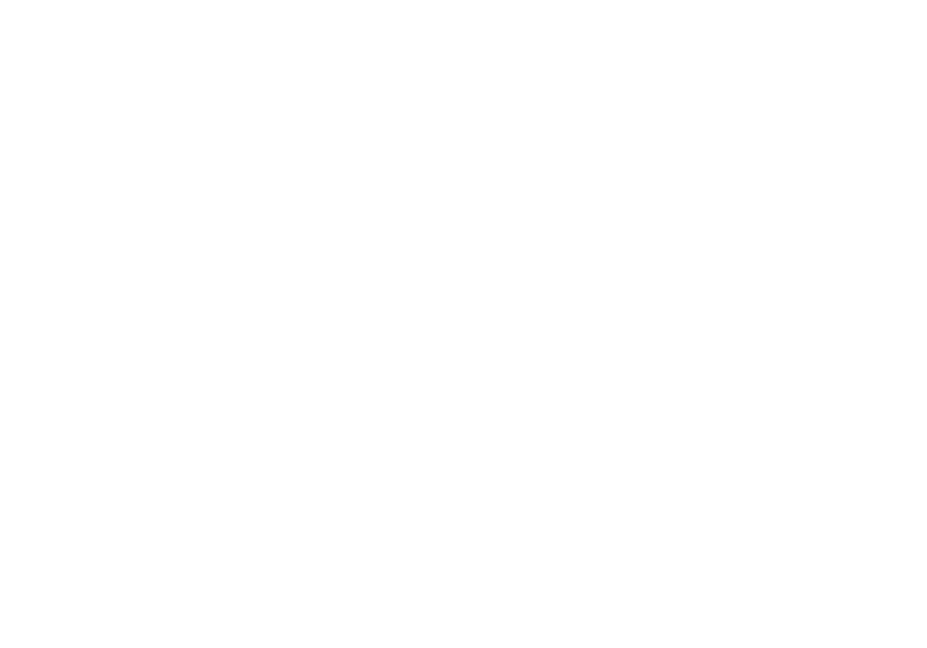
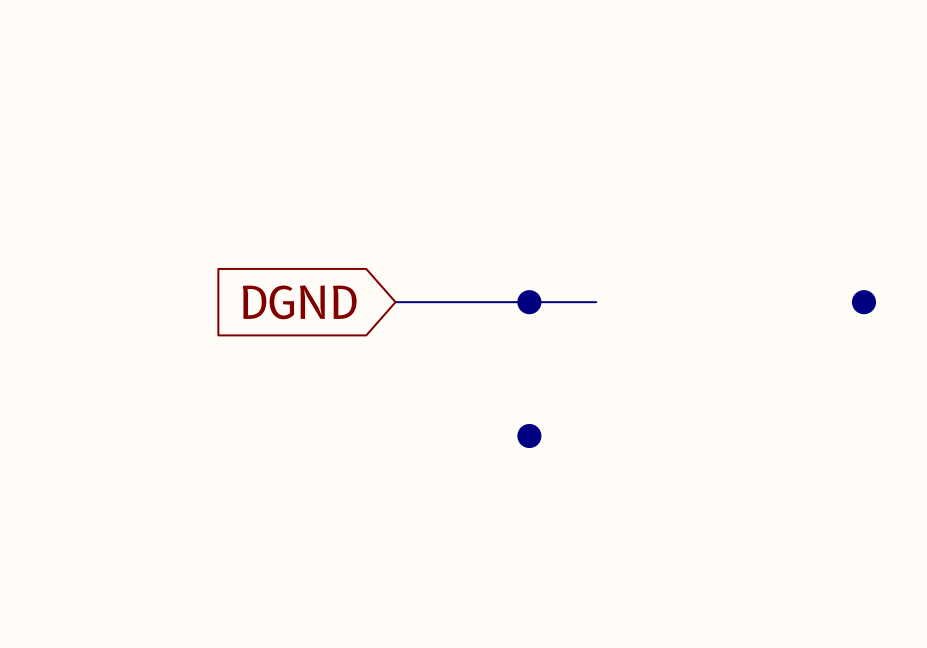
global label: none -> DGND (299, 302)
wire: none -> (395, 302) (596, 302)
junction: none -> (529, 302)
junction: none -> (863, 302)
junction: none -> (529, 436)

